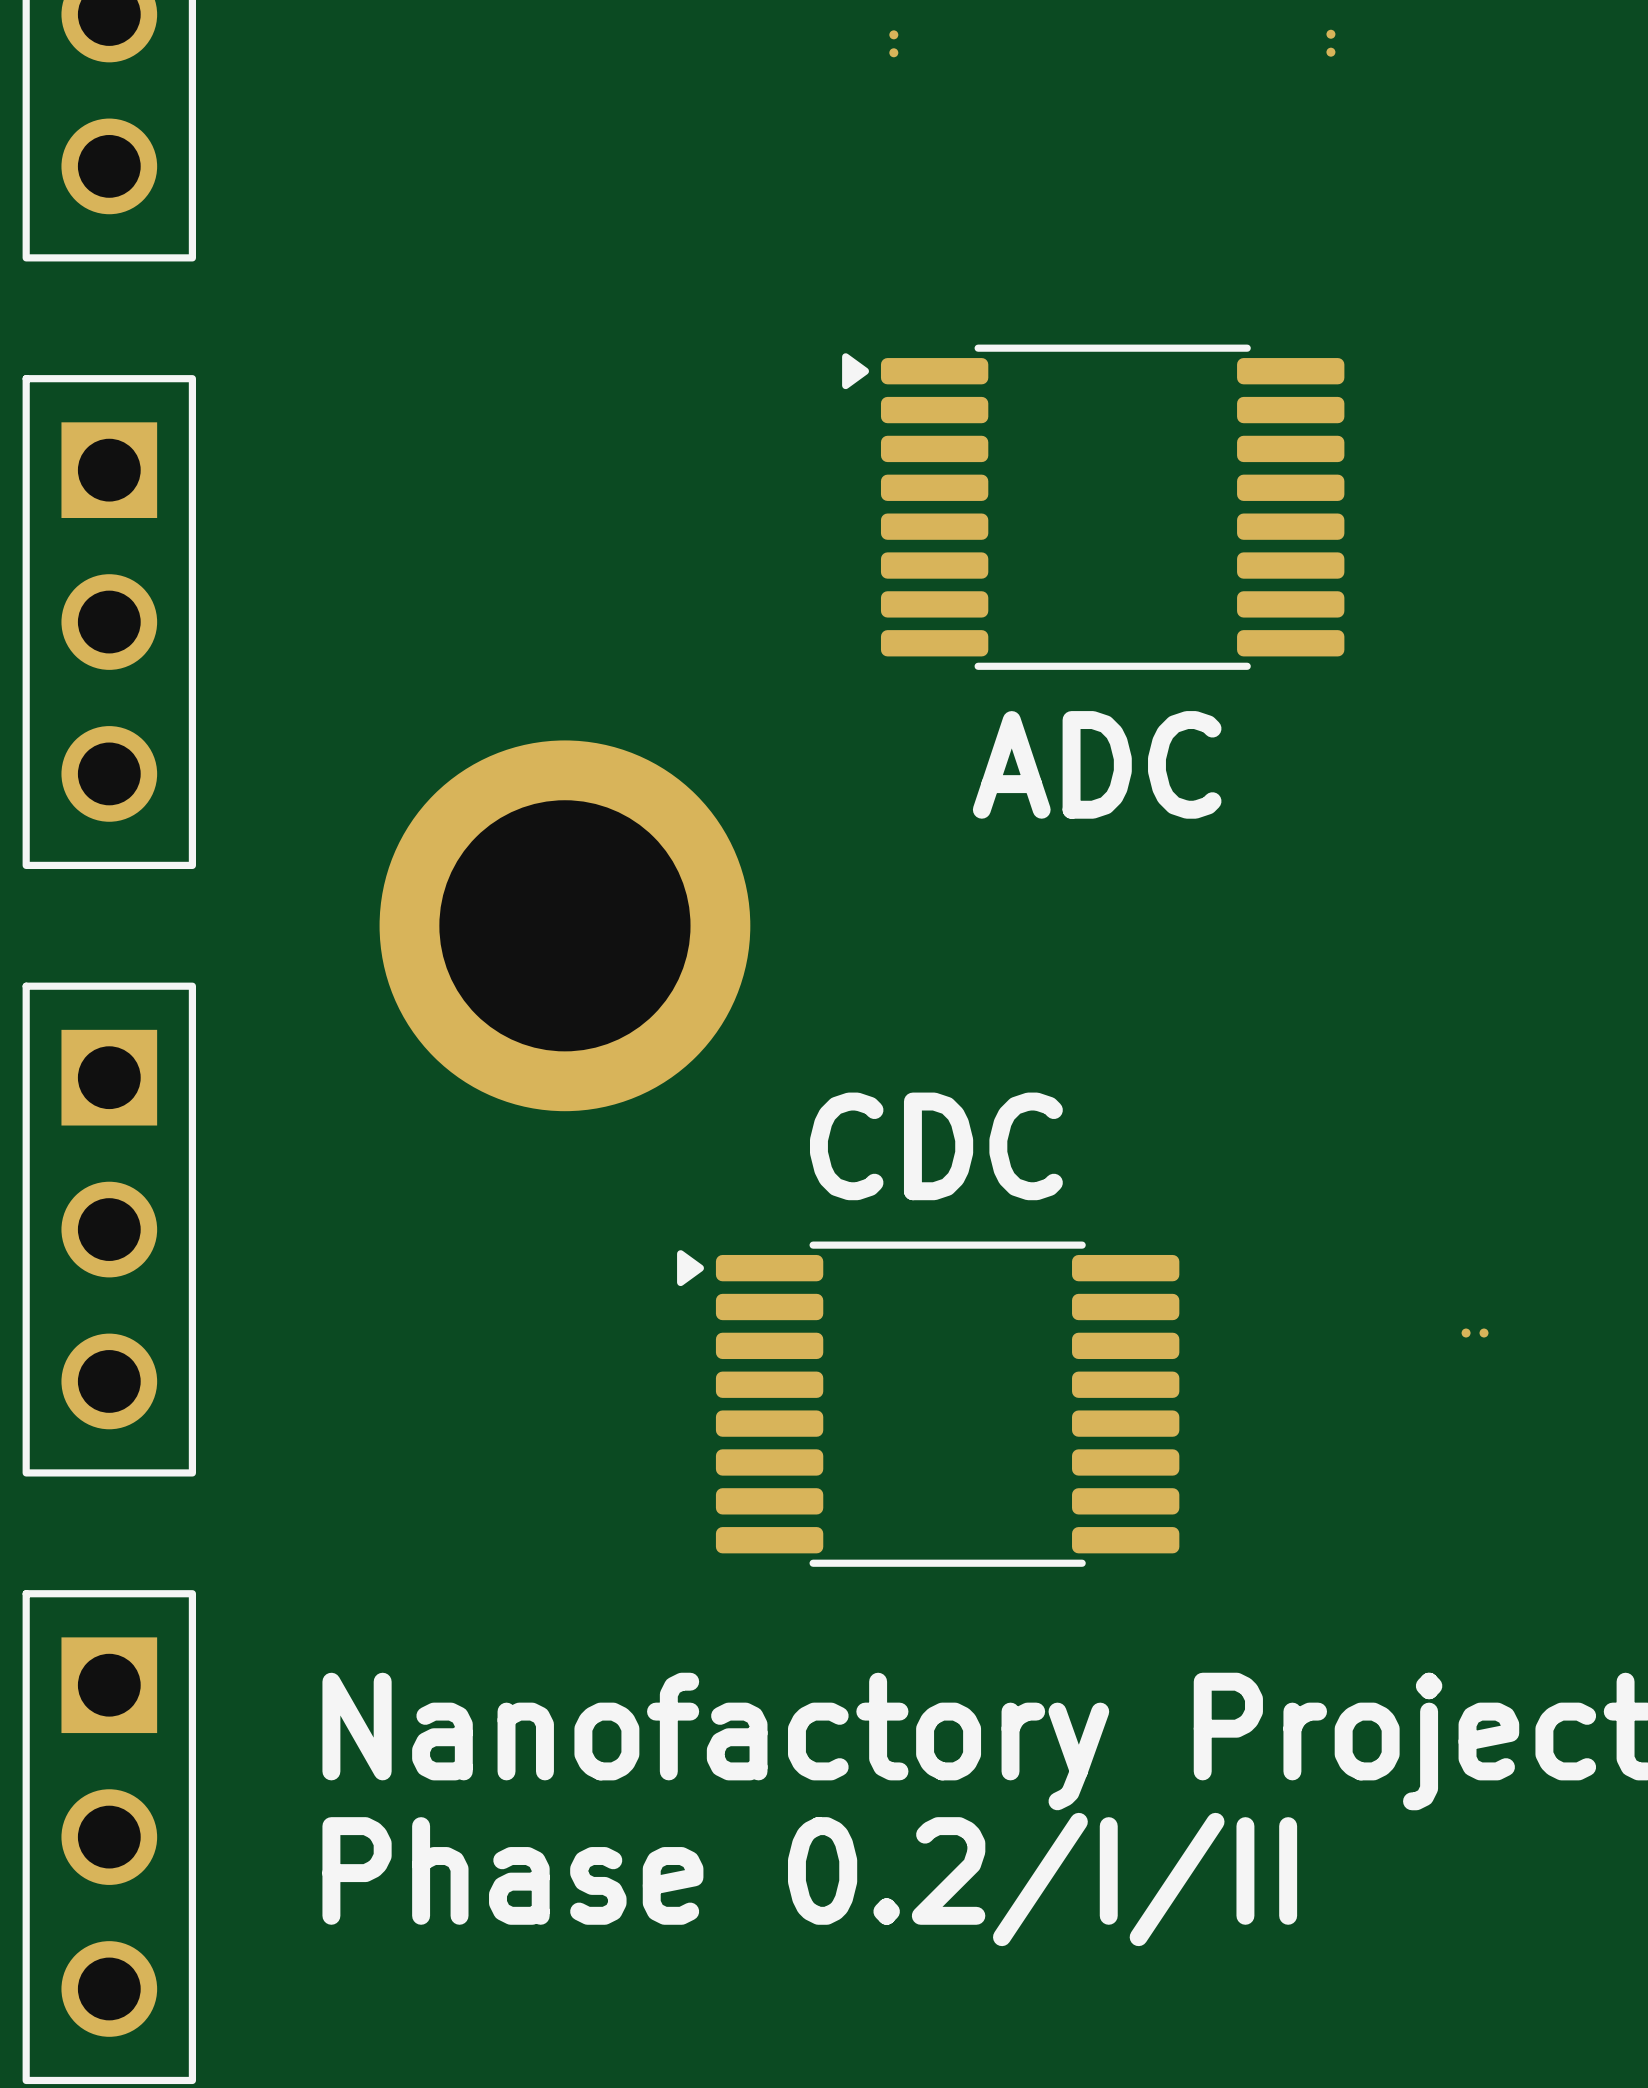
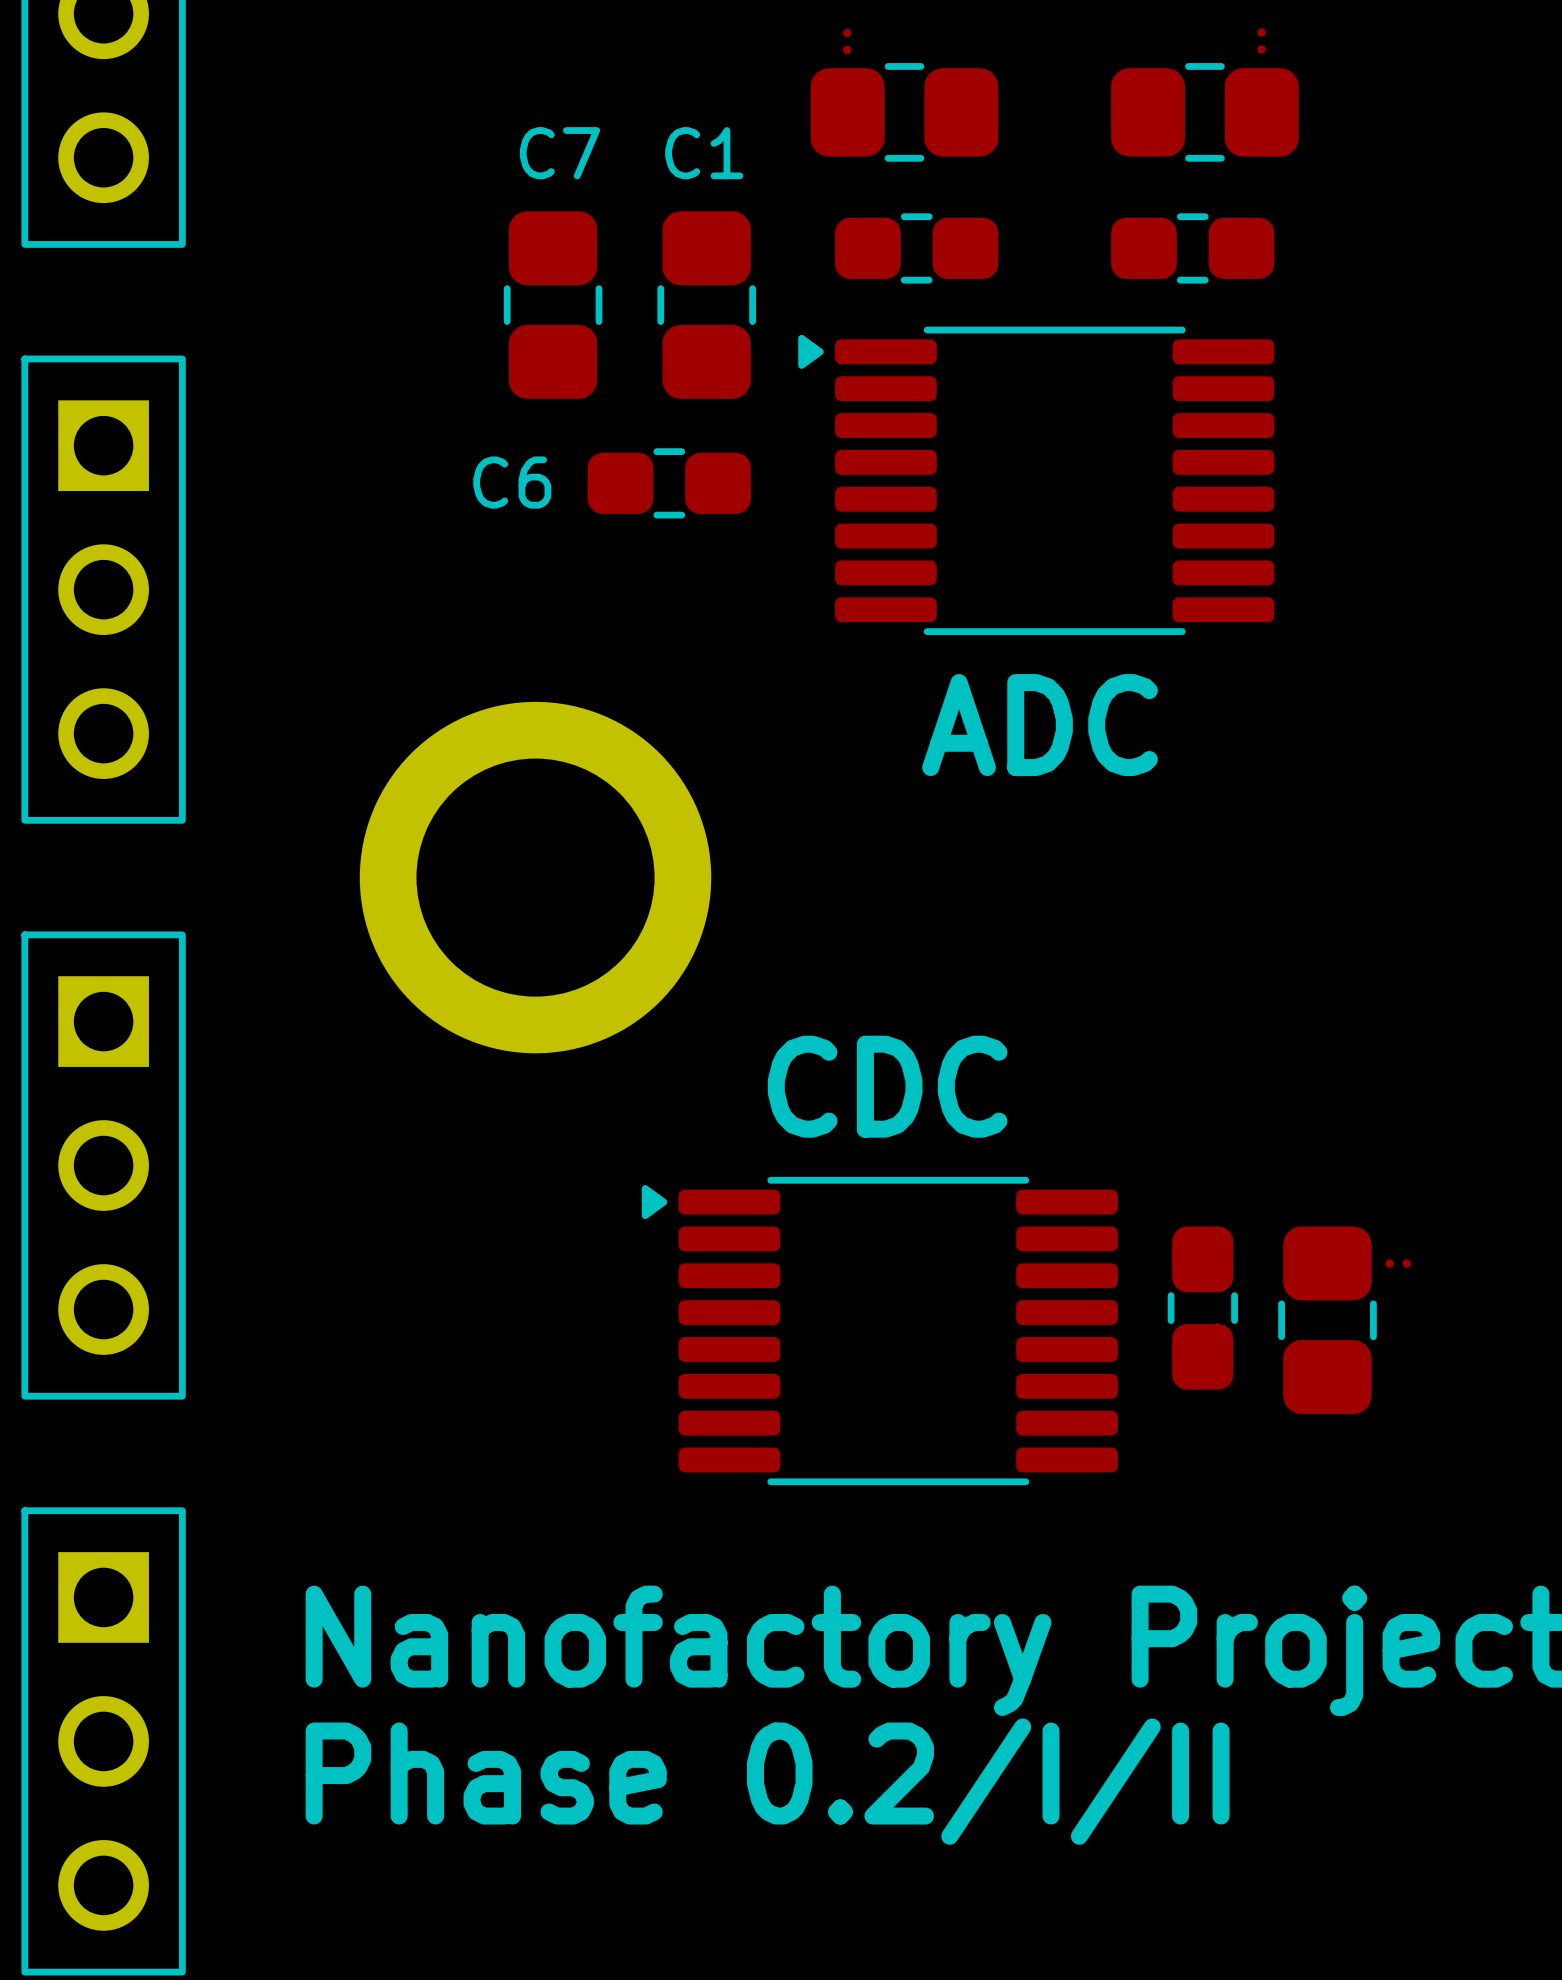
part: none -> (904, 112)
part: none -> (1204, 112)
part: none -> (916, 248)
part: none -> (1192, 248)
C7: none -> (553, 305)
C1: none -> (706, 305)
C6: none -> (669, 483)
part: none -> (1202, 1308)
part: none -> (1327, 1320)

